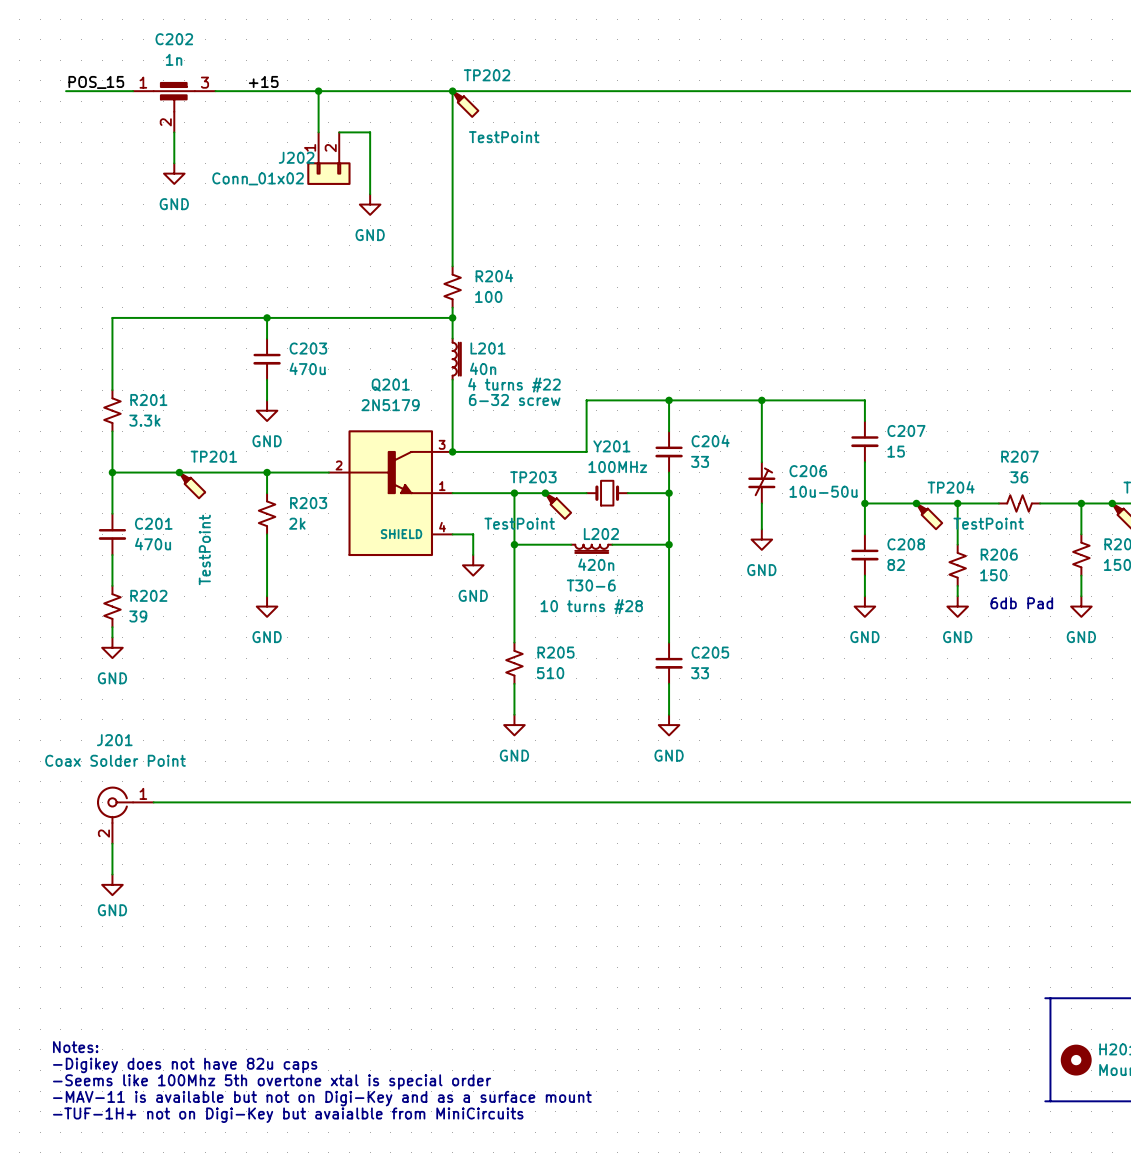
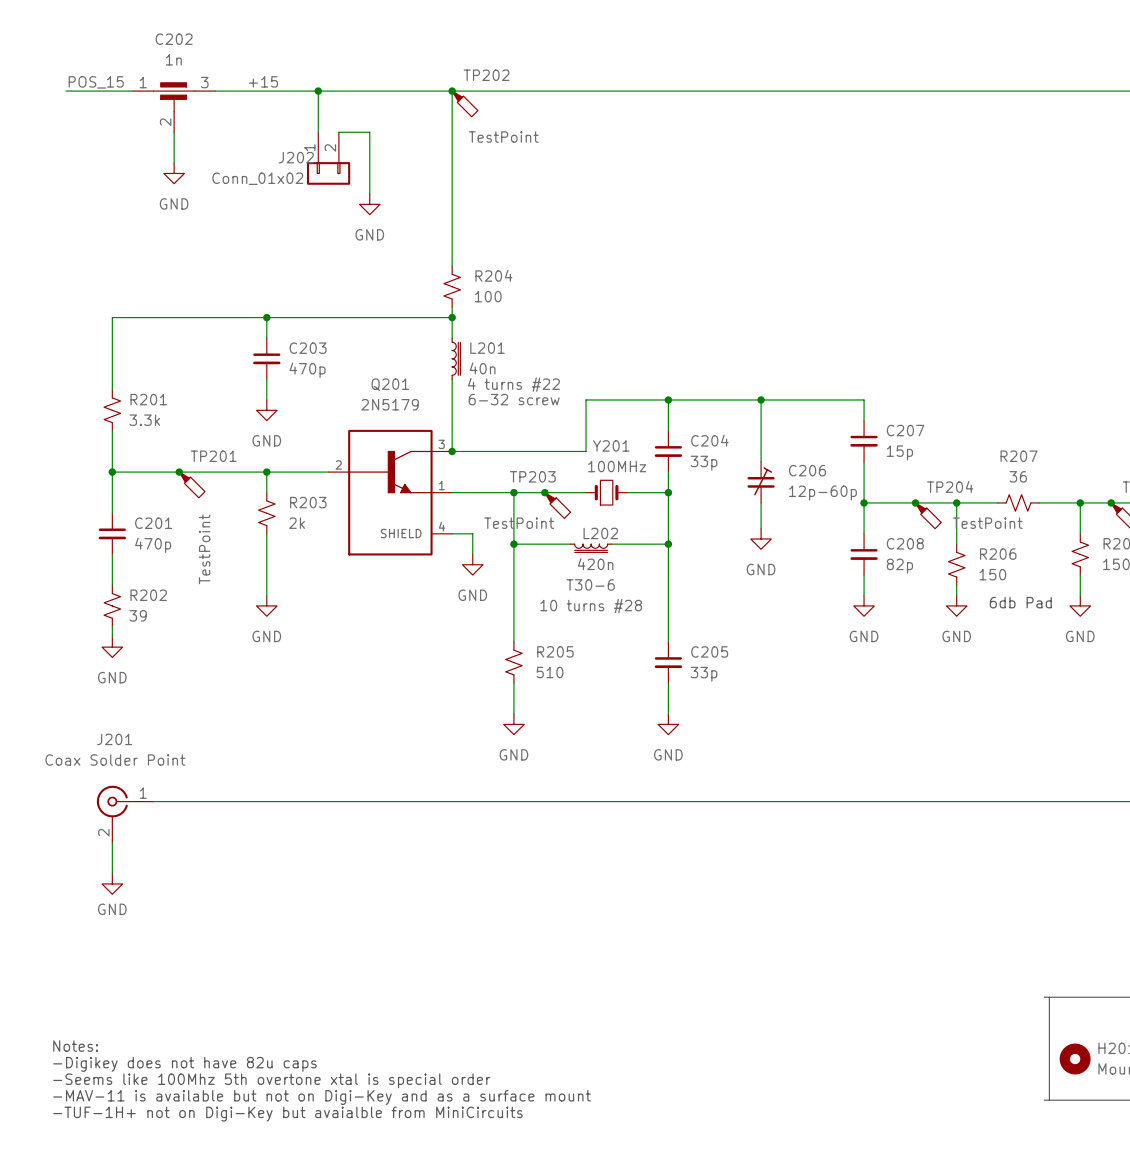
C203 value: 470u (307, 368) -> 470p (307, 370)
C207 value: 15 (896, 451) -> 15p (899, 452)
C204 value: 33 (700, 461) -> 33p (704, 463)
C206 value: 10u-50u (823, 491) -> 12p-60p (822, 492)
C201 value: 470u (153, 544) -> 470p (153, 545)
C208 value: 82 (896, 564) -> 82p (899, 566)
C205 value: 33 (700, 673) -> 33p (704, 674)

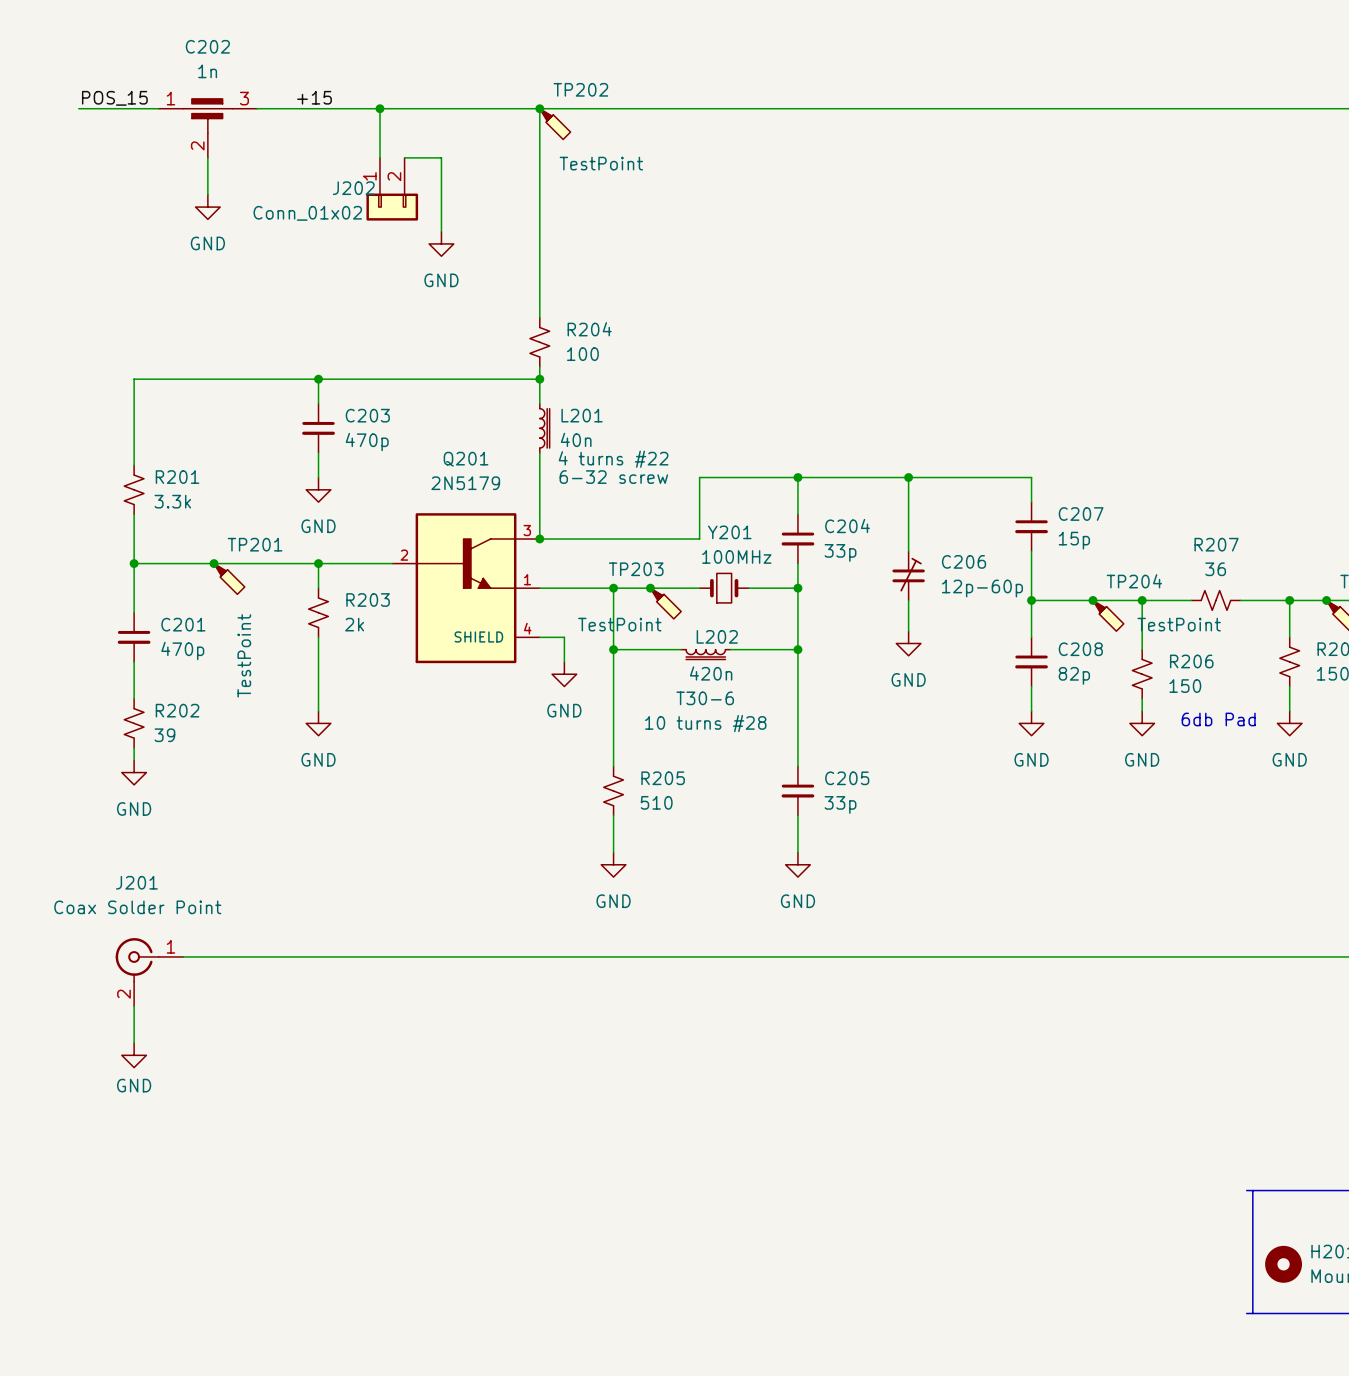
text: Notes: (75, 1046) -> none
text: -Digikey does not have 82u caps (184, 1064) -> none
text: -Seems like 100Mhz 5th overtone xtal is special order (271, 1080) -> none
text: -MAV-11 is available but not on Digi-Key and as a surface mount (322, 1097) -> none
text: -TUF-1H+ not on Digi-Key but avaialble from MiniCircuits (287, 1114) -> none

